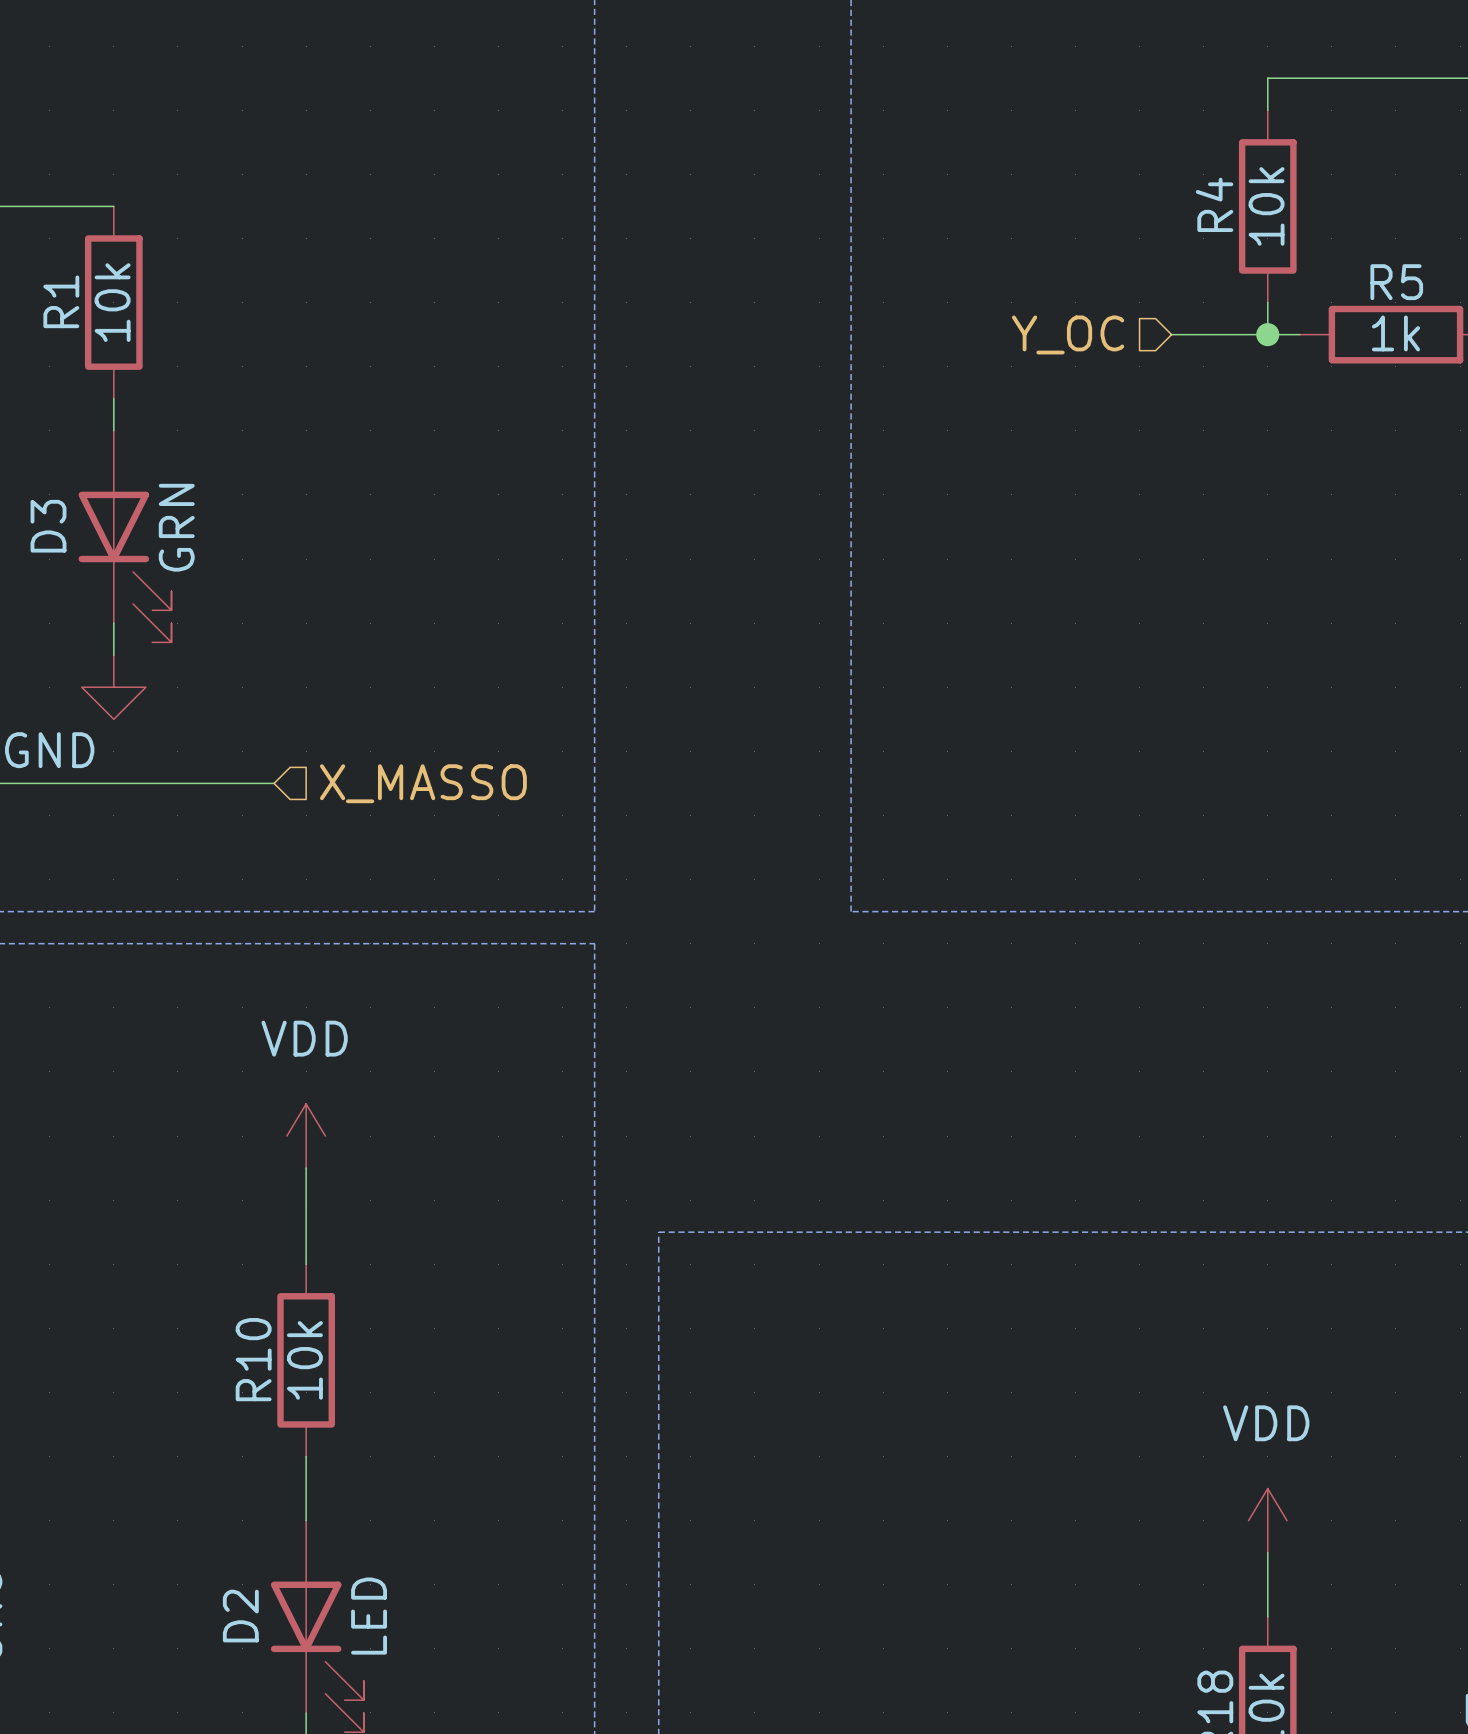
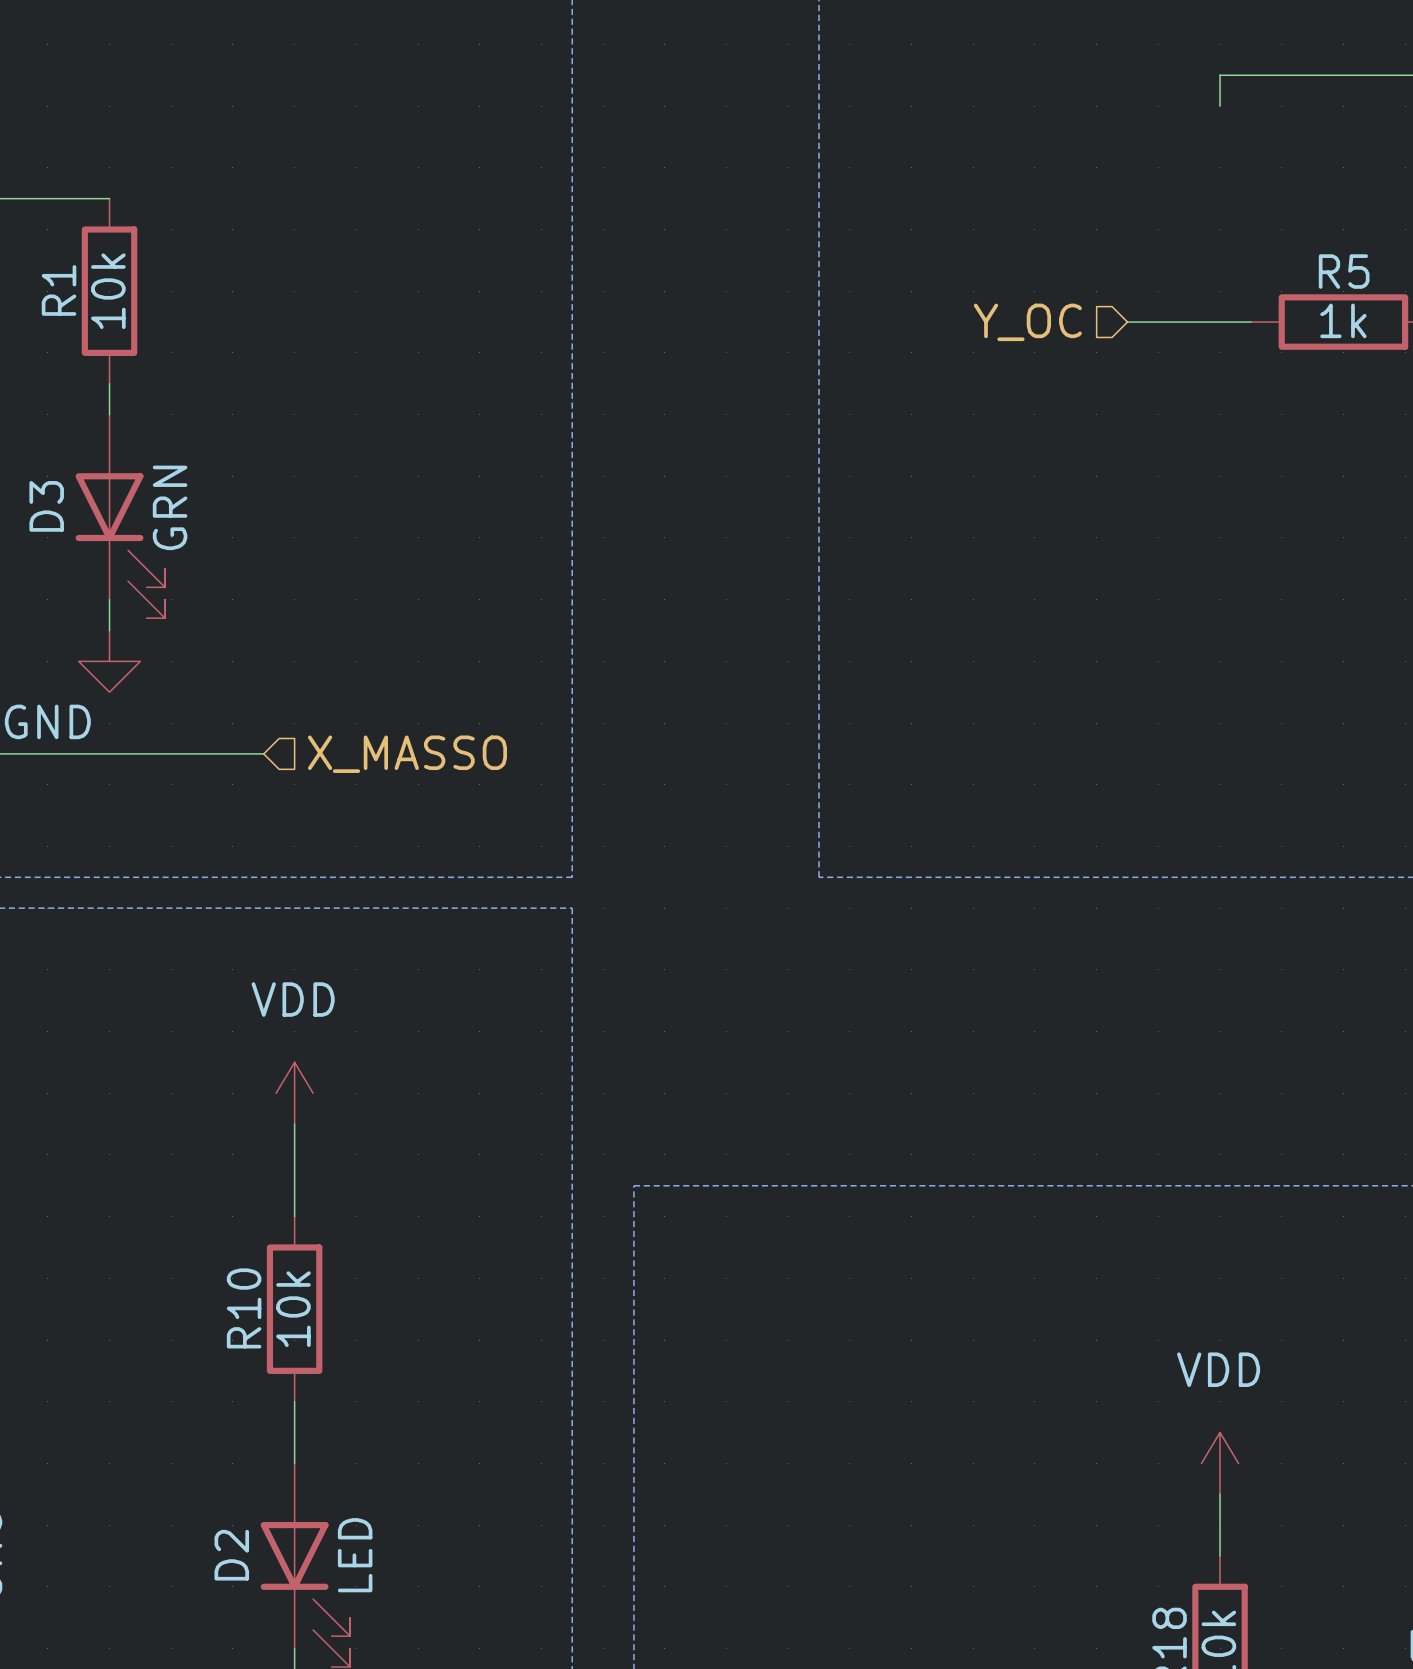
R4: 10k (1267, 206) -> none
wire: (1267, 302) (1267, 334) -> none
junction: (1267, 334) -> none

